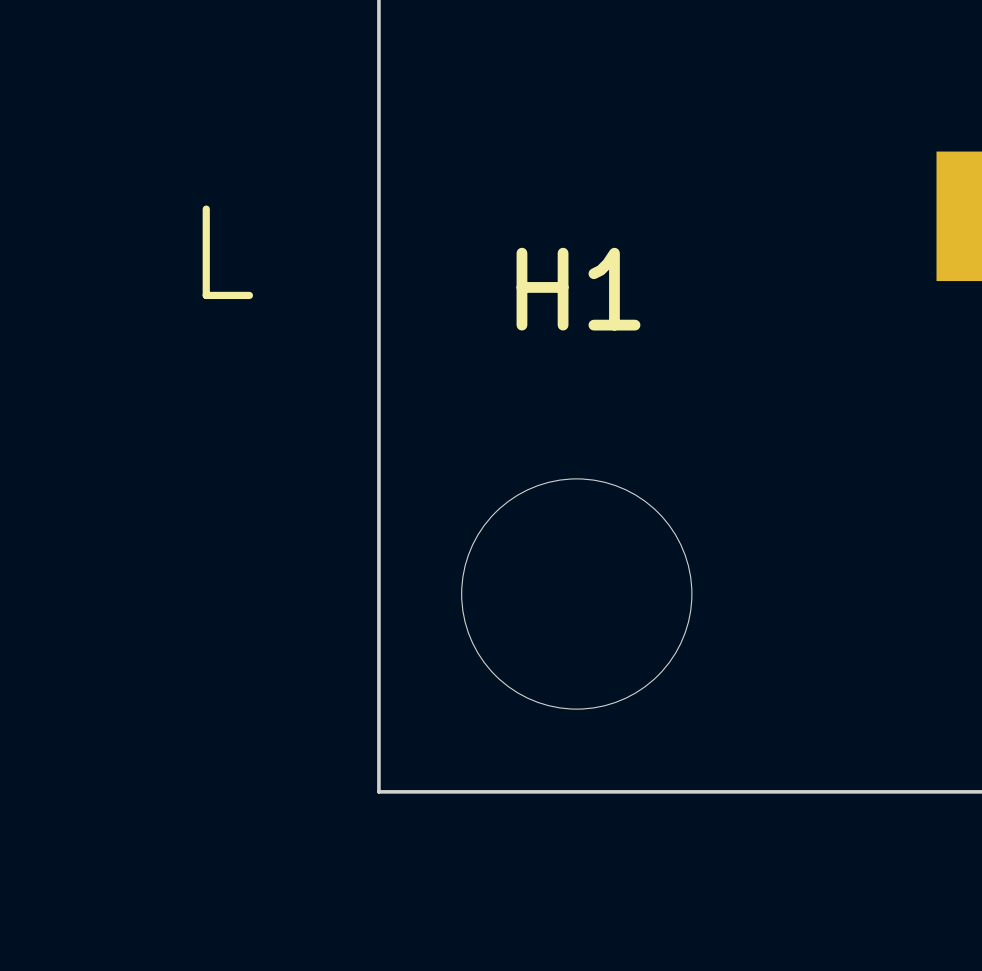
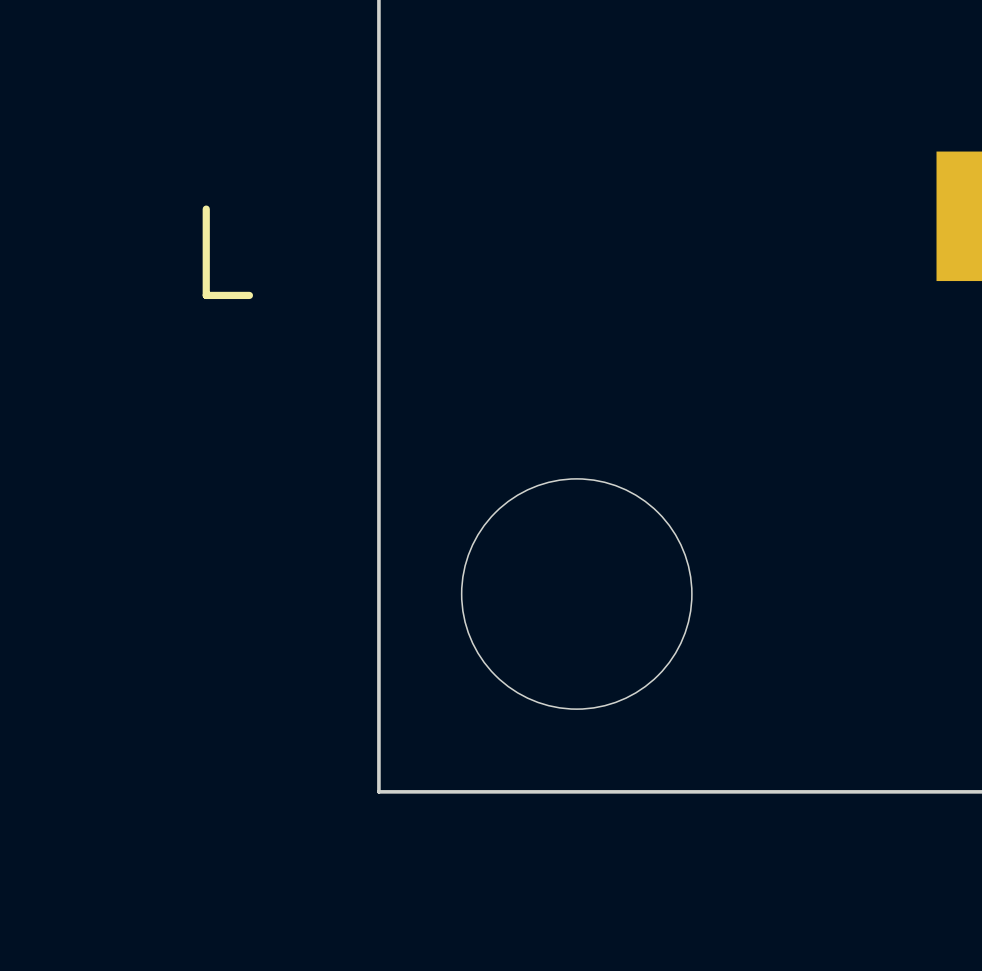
H1 name: H1 (578, 289) -> none

